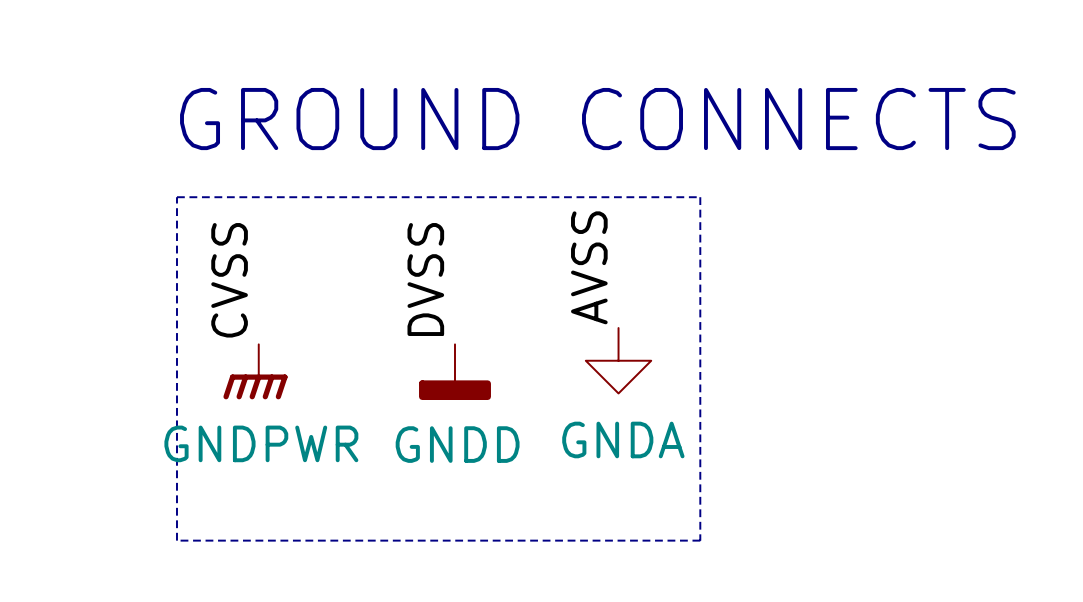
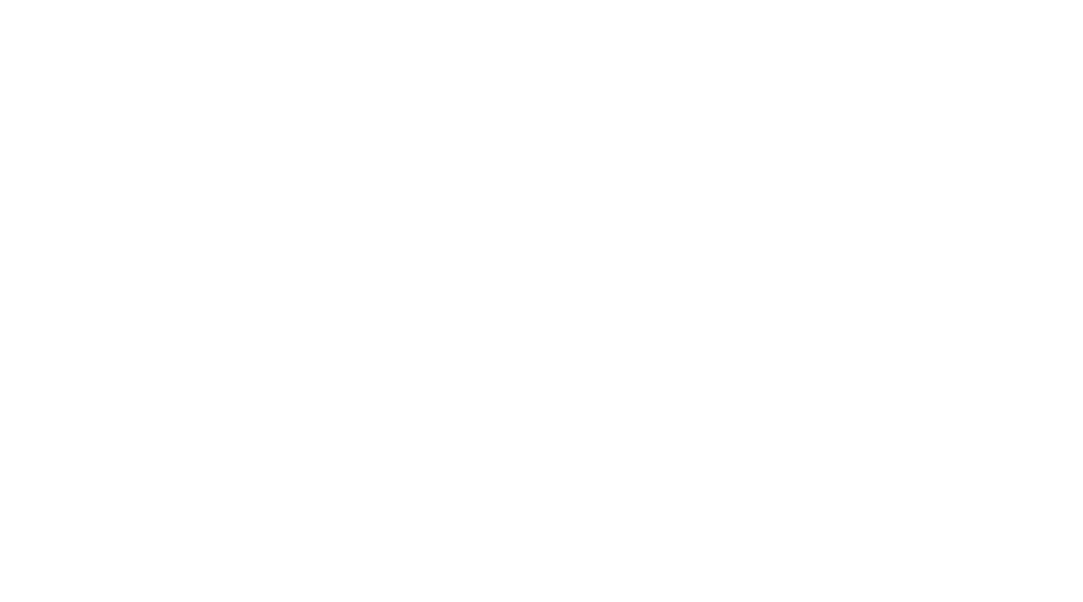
text: GROUND CONNECTS (597, 119) -> none
line: (176, 197) (700, 197) (700, 540) (176, 540) (176, 197) -> none
label: AVSS (589, 267) -> none
label: DVSS (425, 279) -> none
label: CVSS (229, 280) -> none
power symbol: GNDA (618, 360) -> none
power symbol: GNDPWR (255, 371) -> none
power symbol: GNDD (454, 372) -> none

